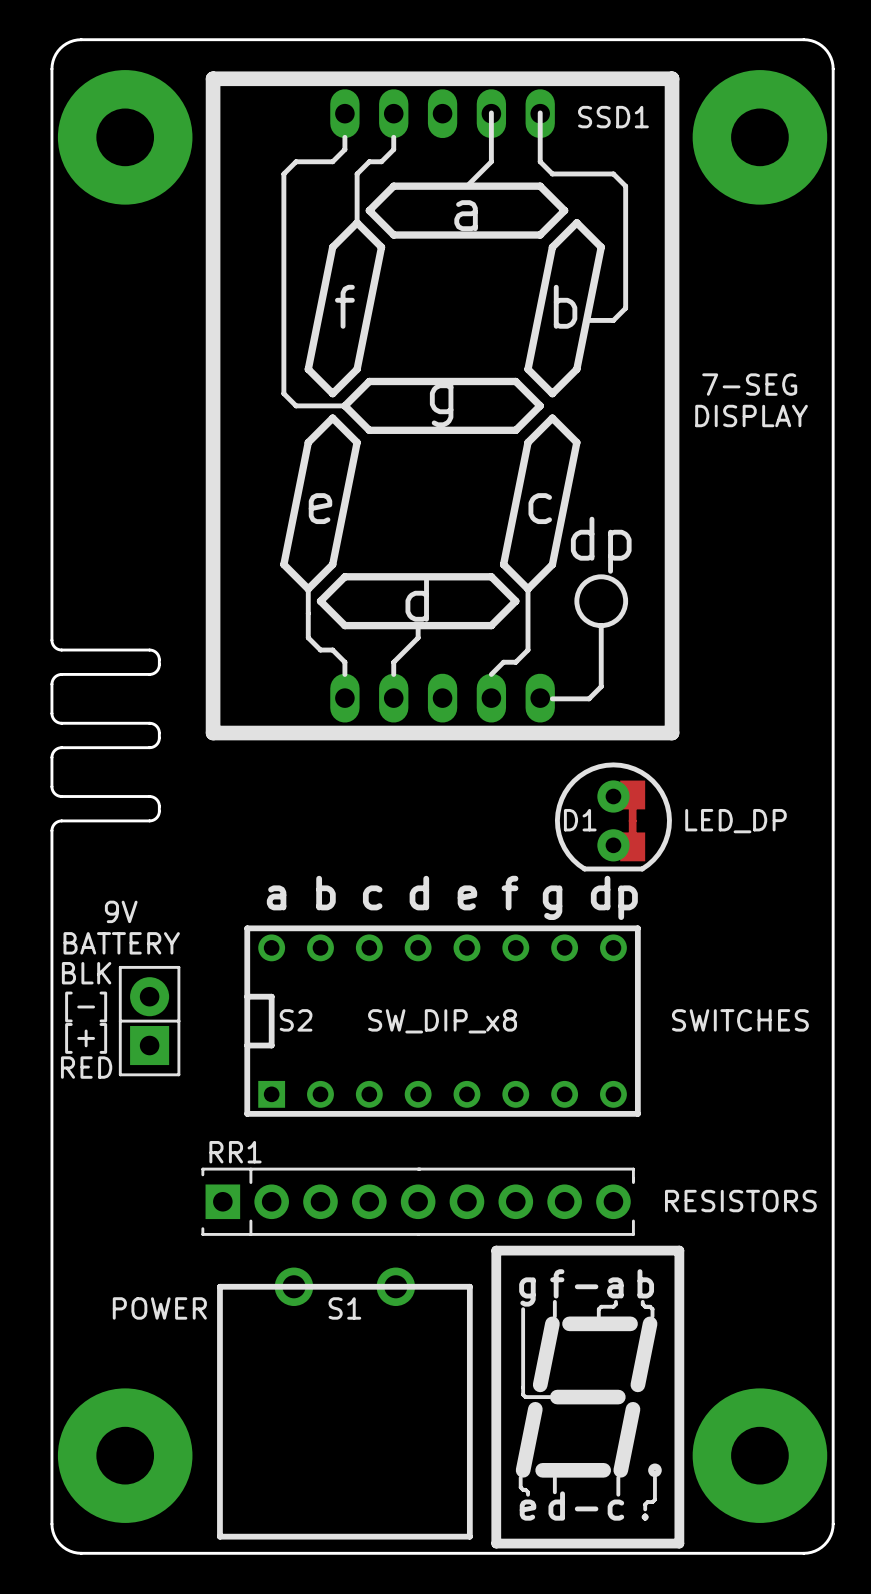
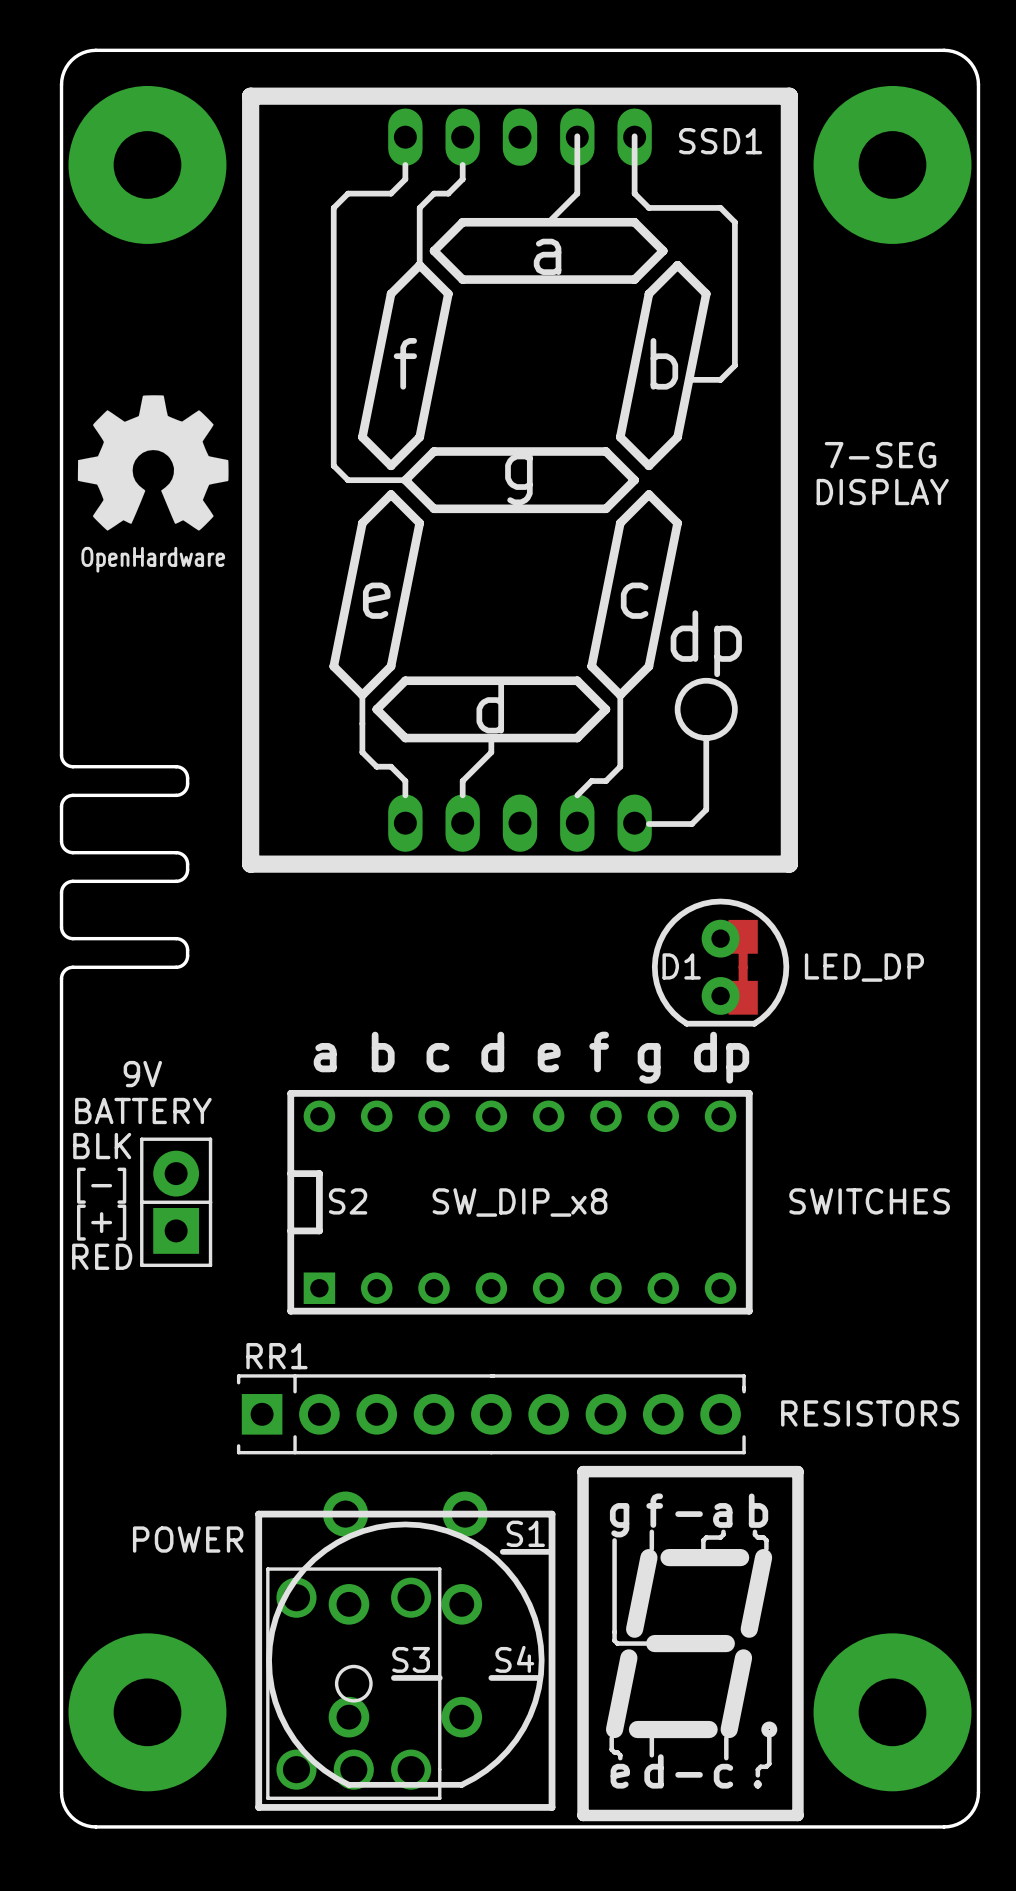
drawing: none -> [77, 395, 229, 531]
S1 name position: S1 (344, 1308) -> S1 (525, 1533)
line: none -> (502, 1551) (548, 1551)
S4: none -> (405, 1654)
line: none -> (393, 1677) (439, 1677)
line: none -> (491, 1677) (537, 1677)
S3: none -> (353, 1683)

